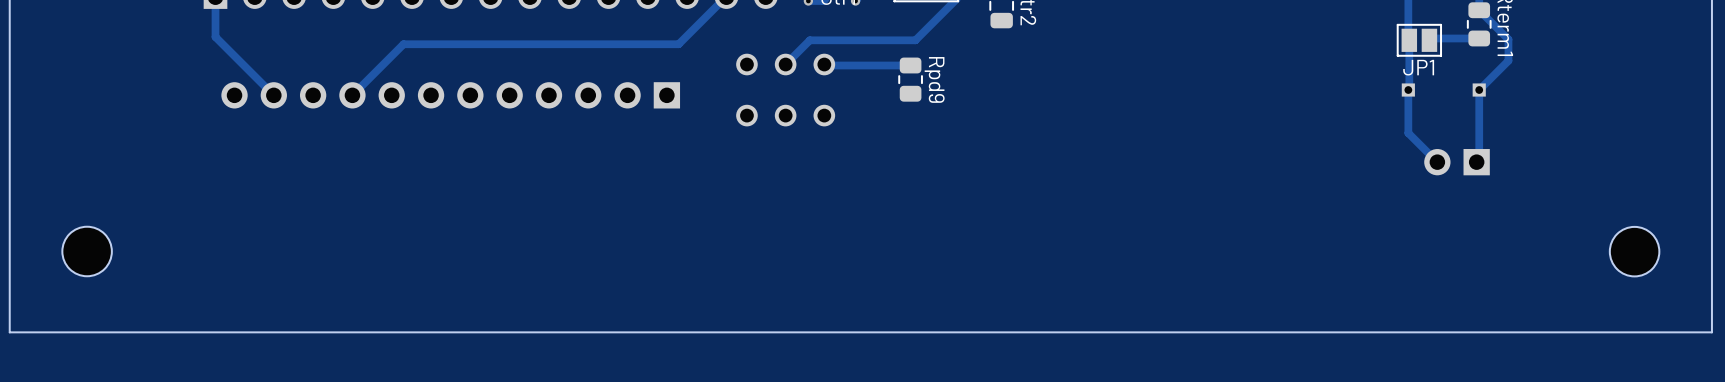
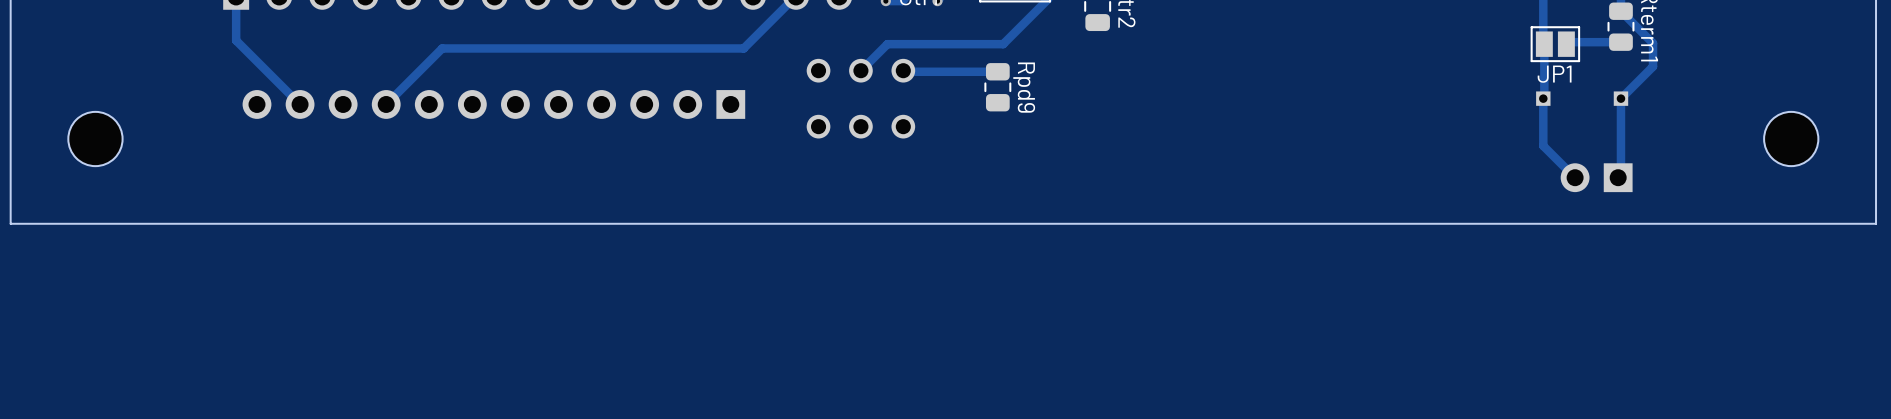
board edge: (1711, 204) (1711, 332) (9, 332) (9, 204) -> (1876, 223) (10, 223)
part position: (87, 251) -> (95, 139)
part position: (1634, 251) -> (1791, 139)

